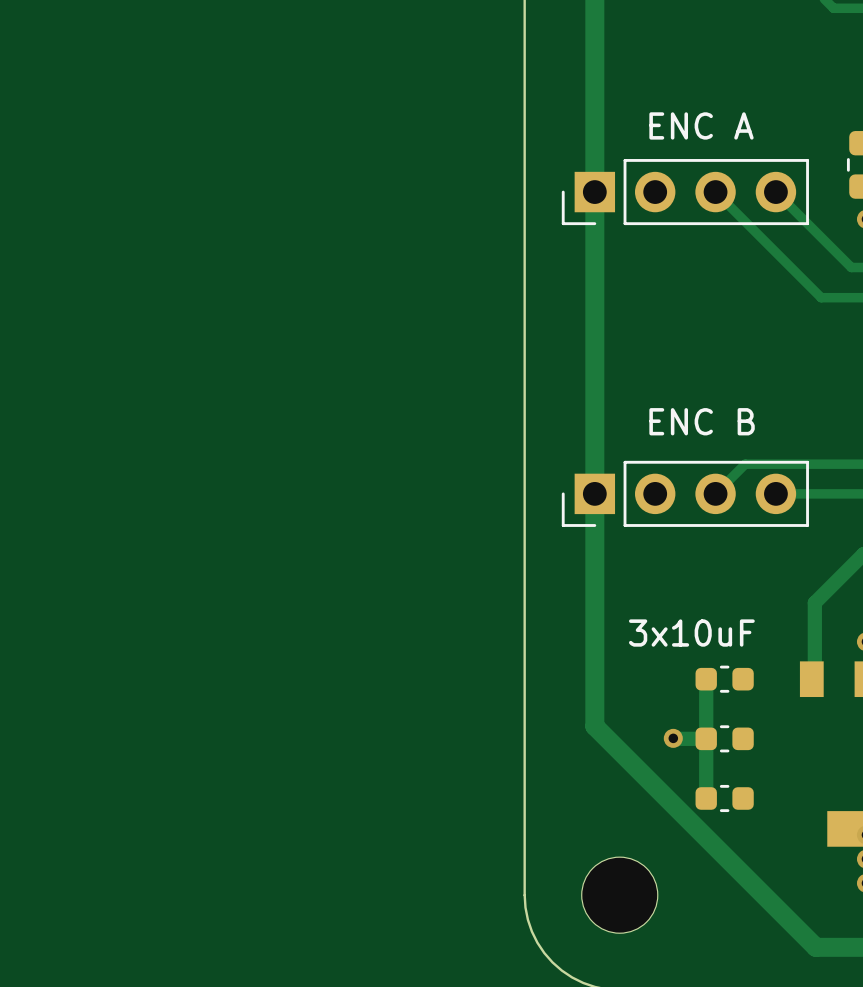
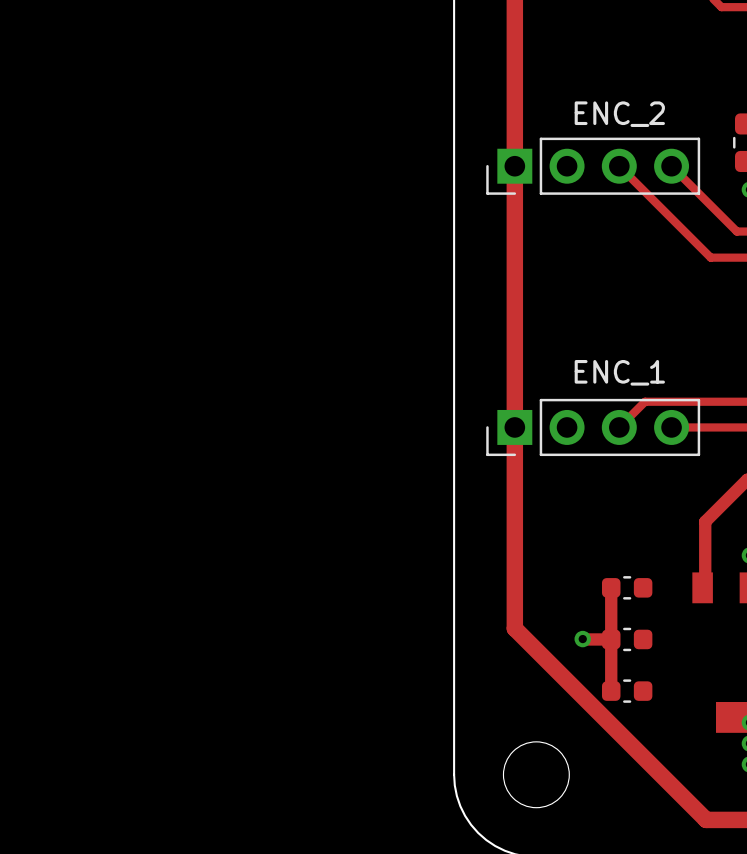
text: ENC A (701, 125) -> none
ENC_2 name: none -> ENC_2 (619, 114)
text: ENC B (702, 421) -> none
ENC_1 name: none -> ENC_1 (619, 372)
text: 3x10uF (691, 633) -> none

